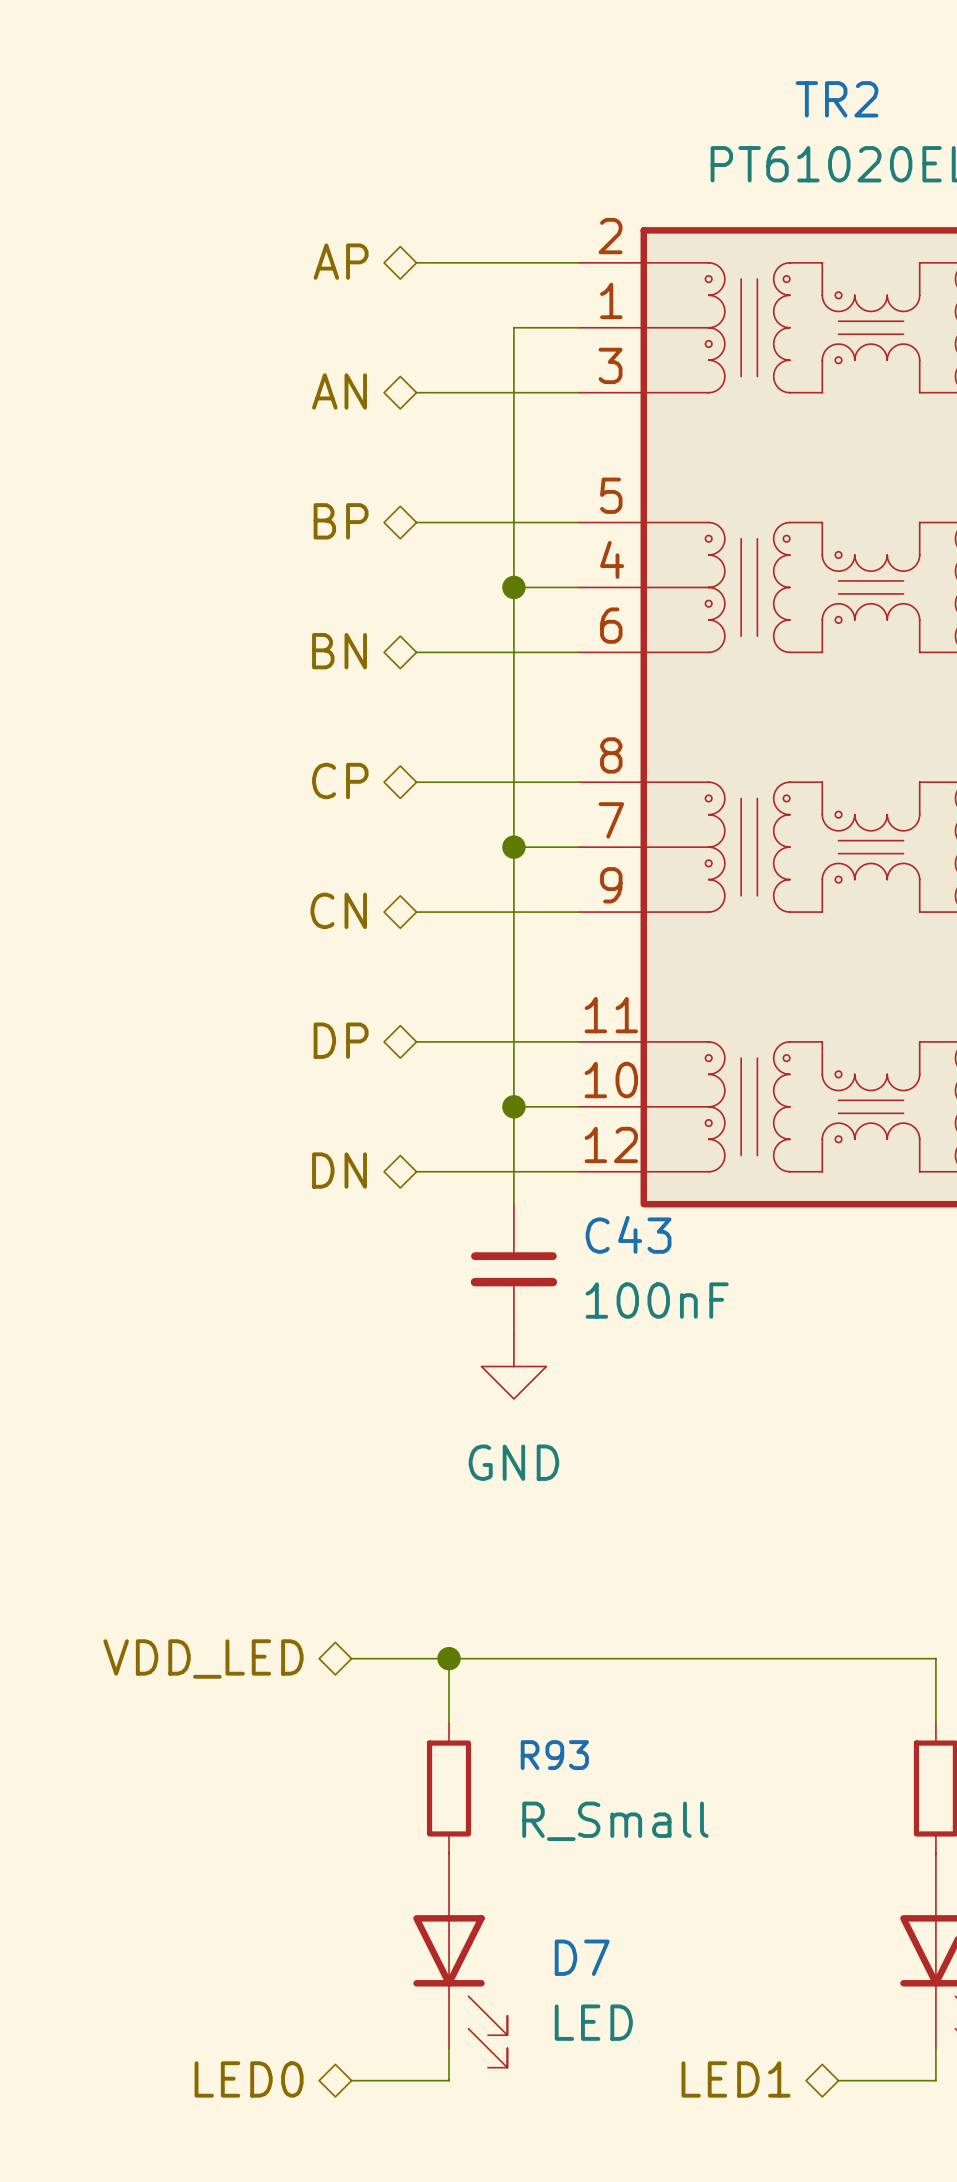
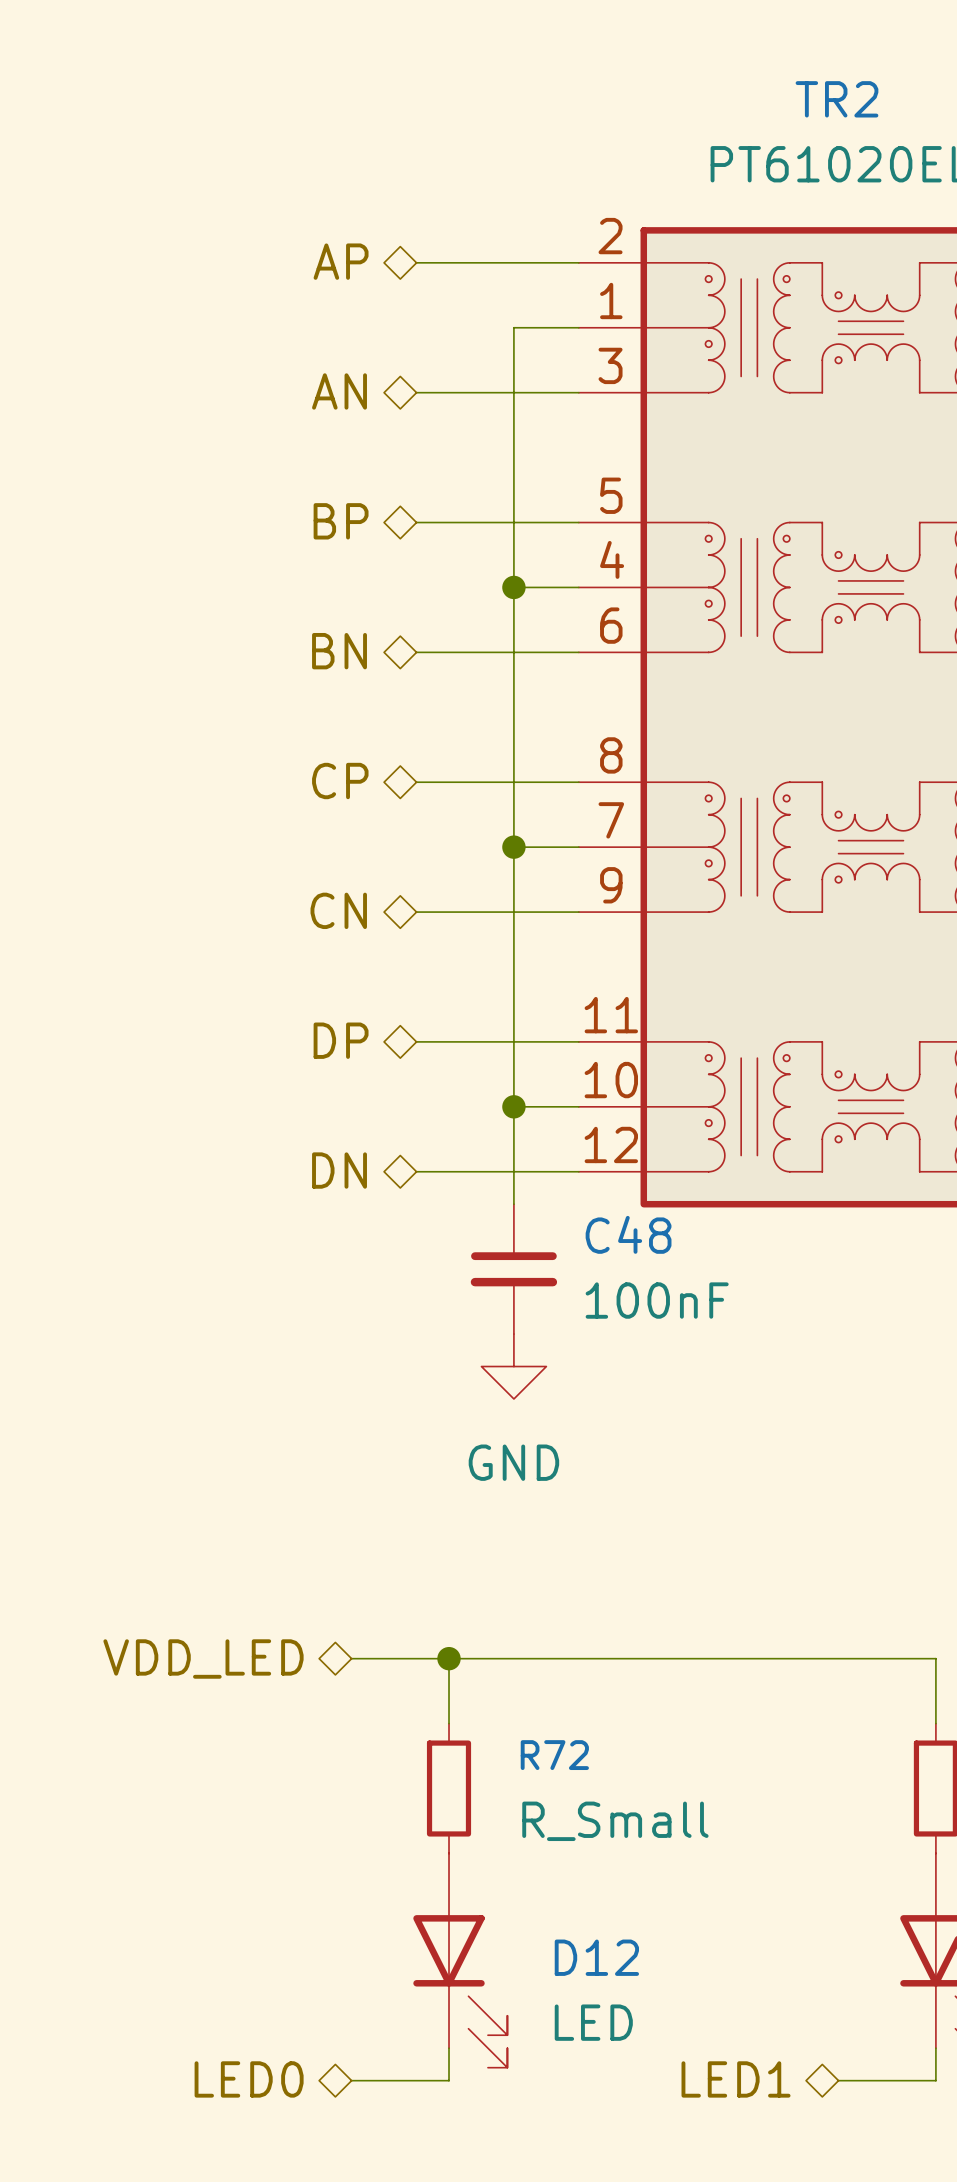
C43 name: C43 (628, 1234) -> C48 (628, 1234)
R93 name: R93 (554, 1755) -> R72 (554, 1755)
D7 name: D7 (582, 1957) -> D12 (596, 1957)

